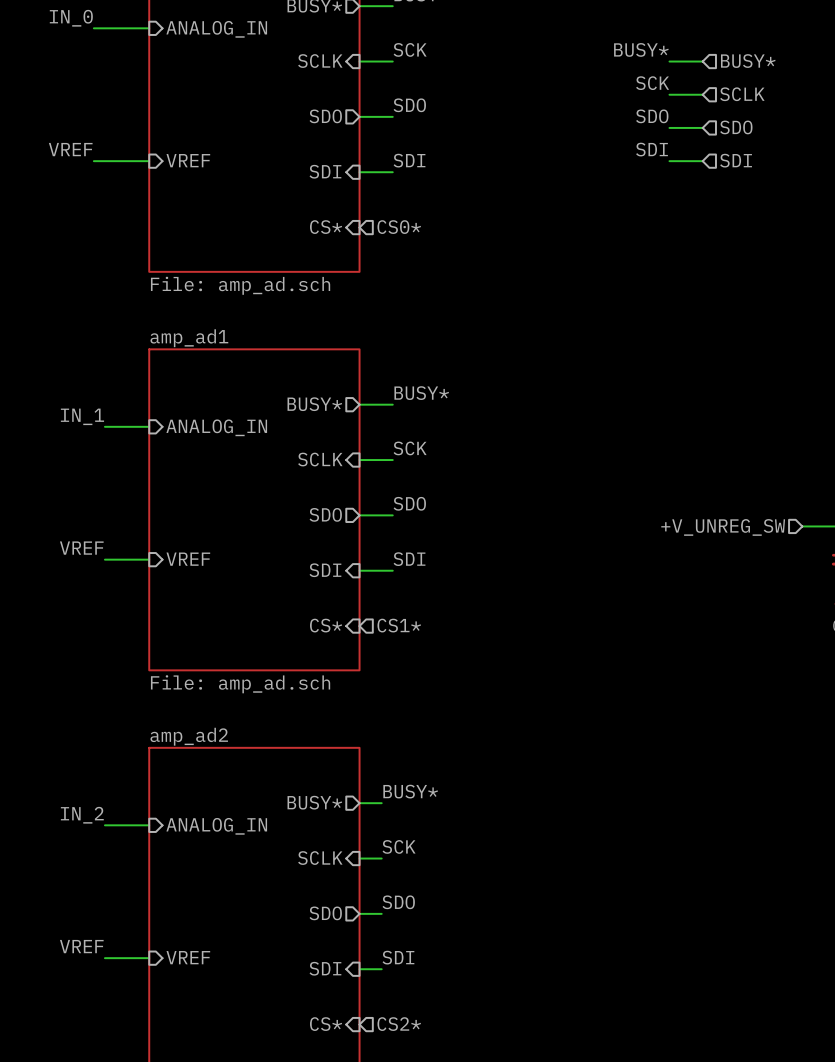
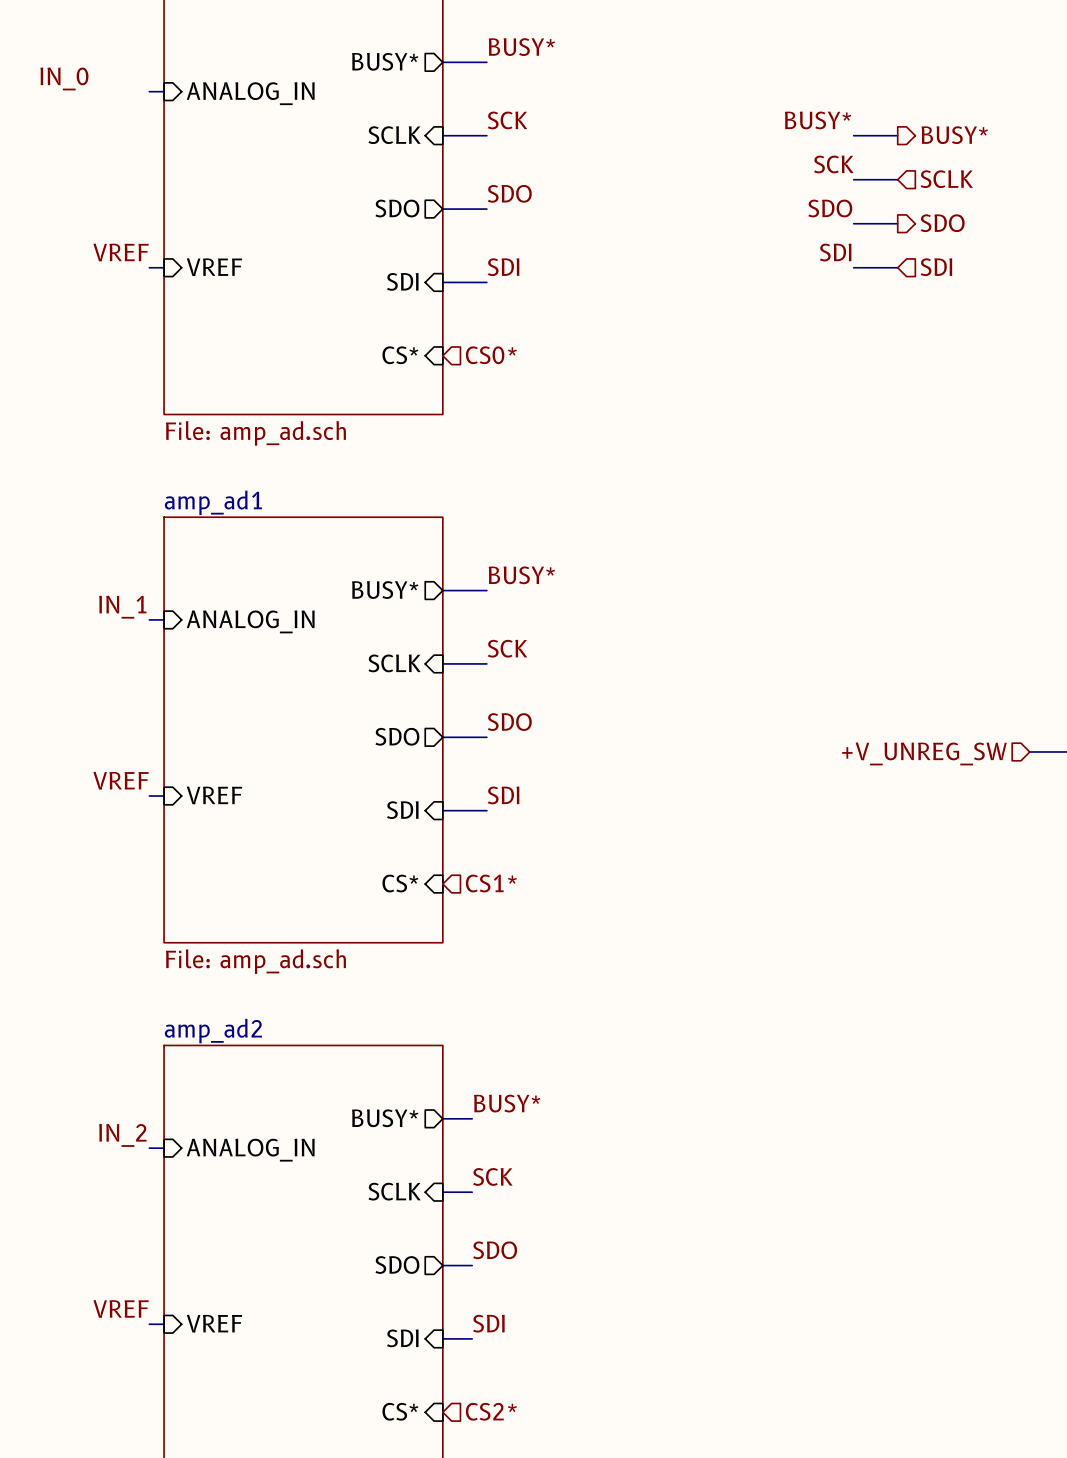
wire: (93, 28) (138, 28) -> none
hierarchical label shape: input (748, 61) -> output (954, 135)
hierarchical label shape: input (736, 127) -> output (942, 223)
label position: VREF (70, 149) -> VREF (121, 252)
wire: (93, 161) (138, 161) -> none
label position: IN_1 (82, 416) -> IN_1 (122, 607)
wire: (104, 426) (138, 426) -> none
label position: VREF (81, 548) -> VREF (121, 780)
wire: (104, 559) (138, 559) -> none
label position: IN_2 (82, 815) -> IN_2 (122, 1135)
wire: (104, 825) (138, 825) -> none
label position: VREF (81, 946) -> VREF (121, 1309)
wire: (104, 958) (138, 958) -> none

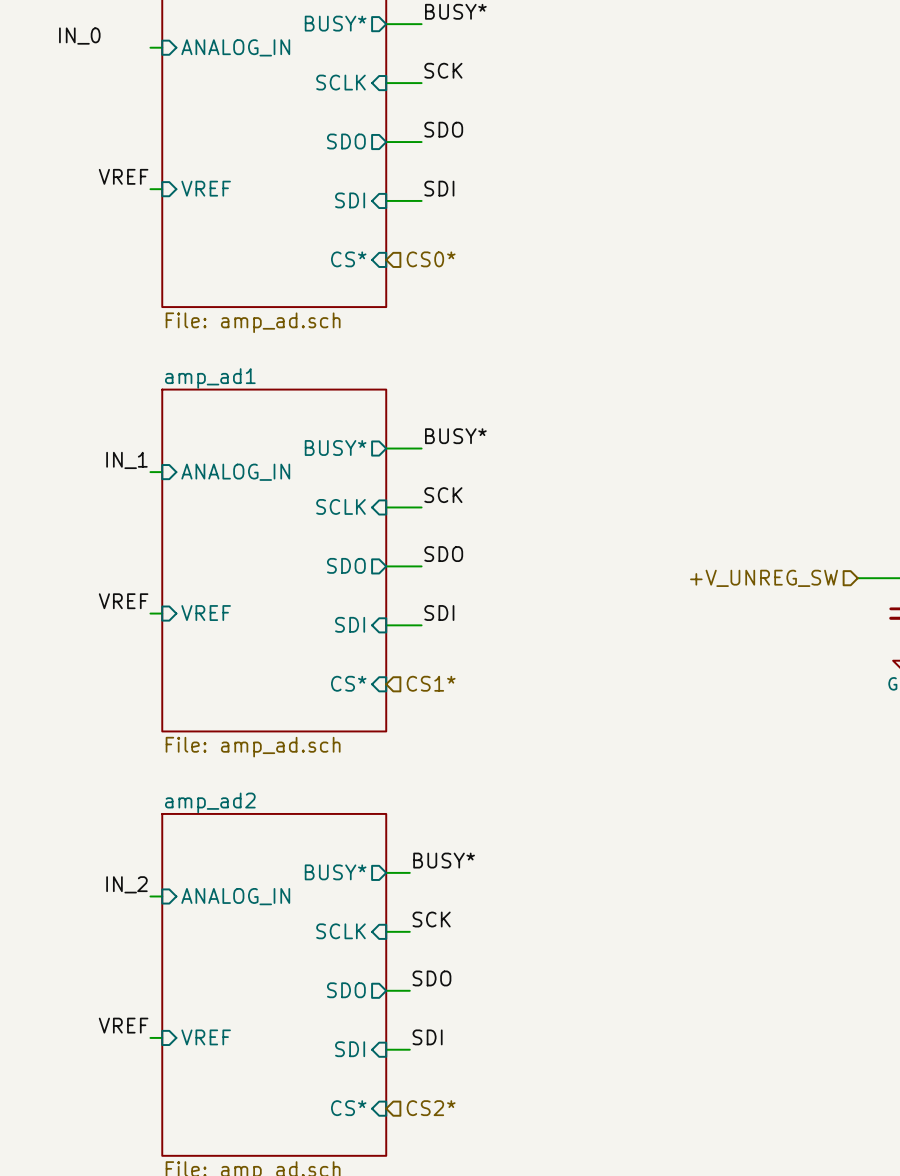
label: BUSY* (818, 120) -> none
wire: (853, 135) (897, 135) -> none
hierarchical label: BUSY* (954, 135) -> none
label: SCK (833, 164) -> none
wire: (853, 179) (897, 179) -> none
hierarchical label: SCLK (946, 179) -> none
label: SDO (830, 208) -> none
wire: (853, 223) (897, 223) -> none
hierarchical label: SDO (942, 223) -> none
label: SDI (835, 252) -> none
wire: (853, 267) (897, 267) -> none
hierarchical label: SDI (936, 267) -> none

